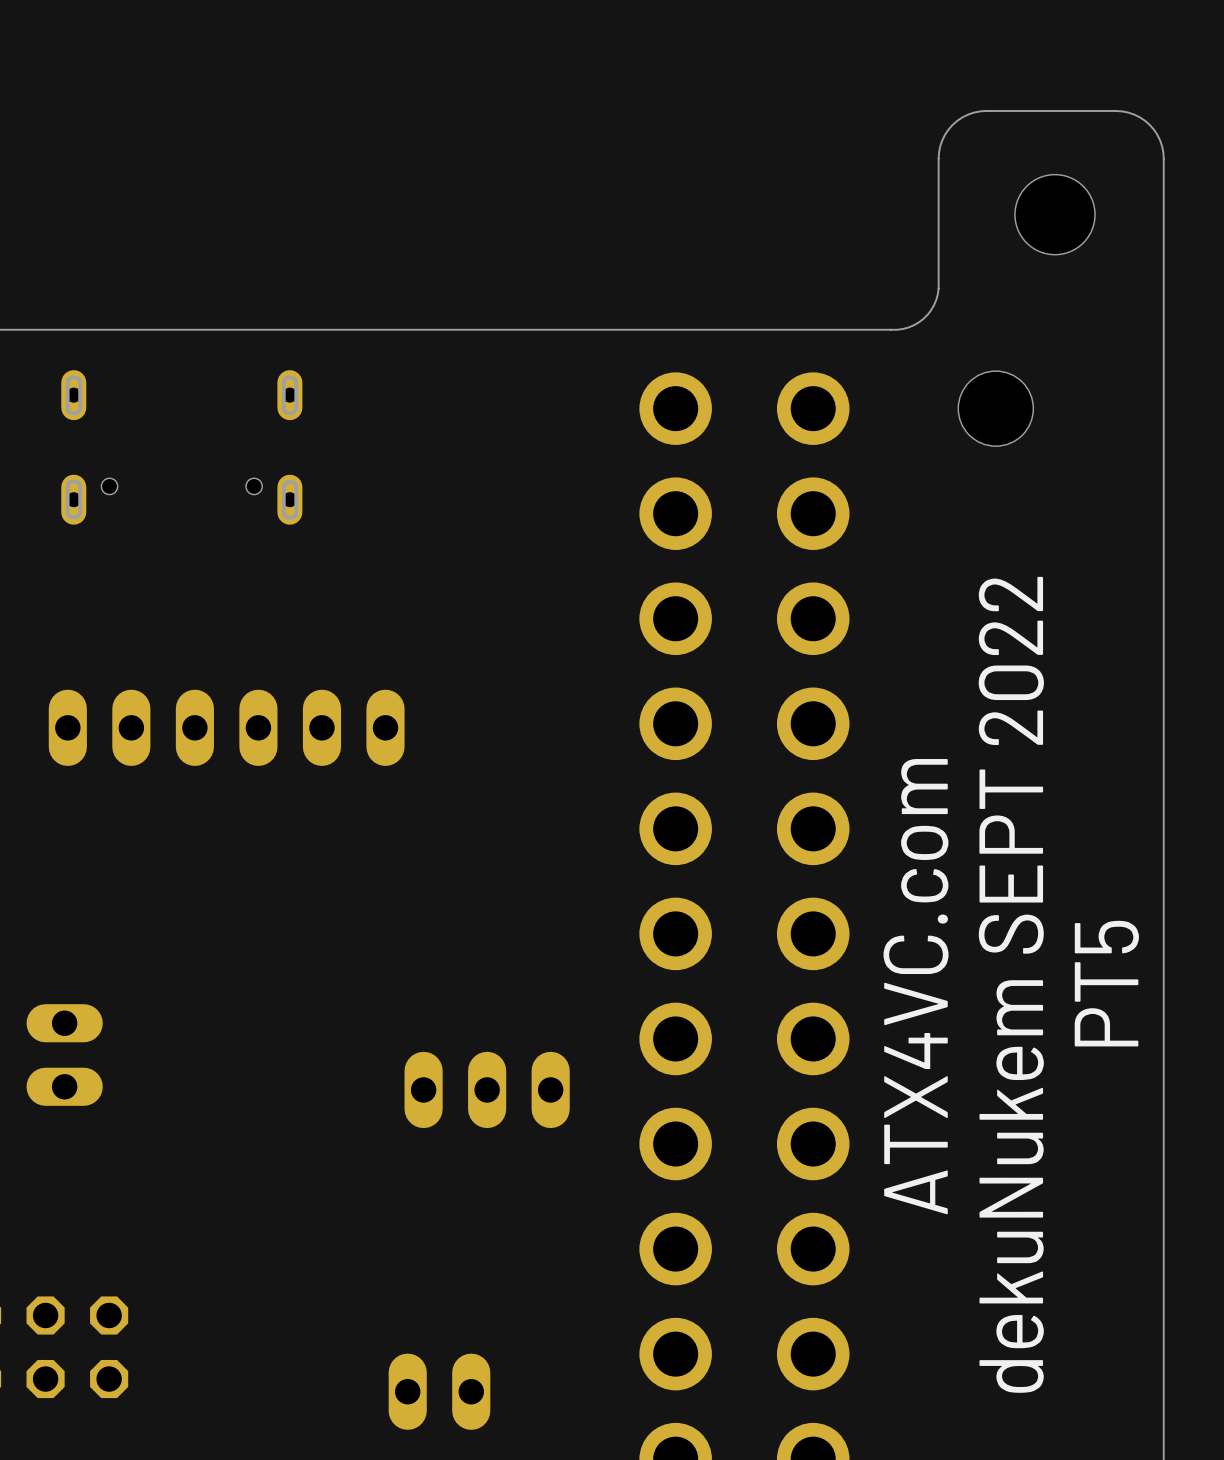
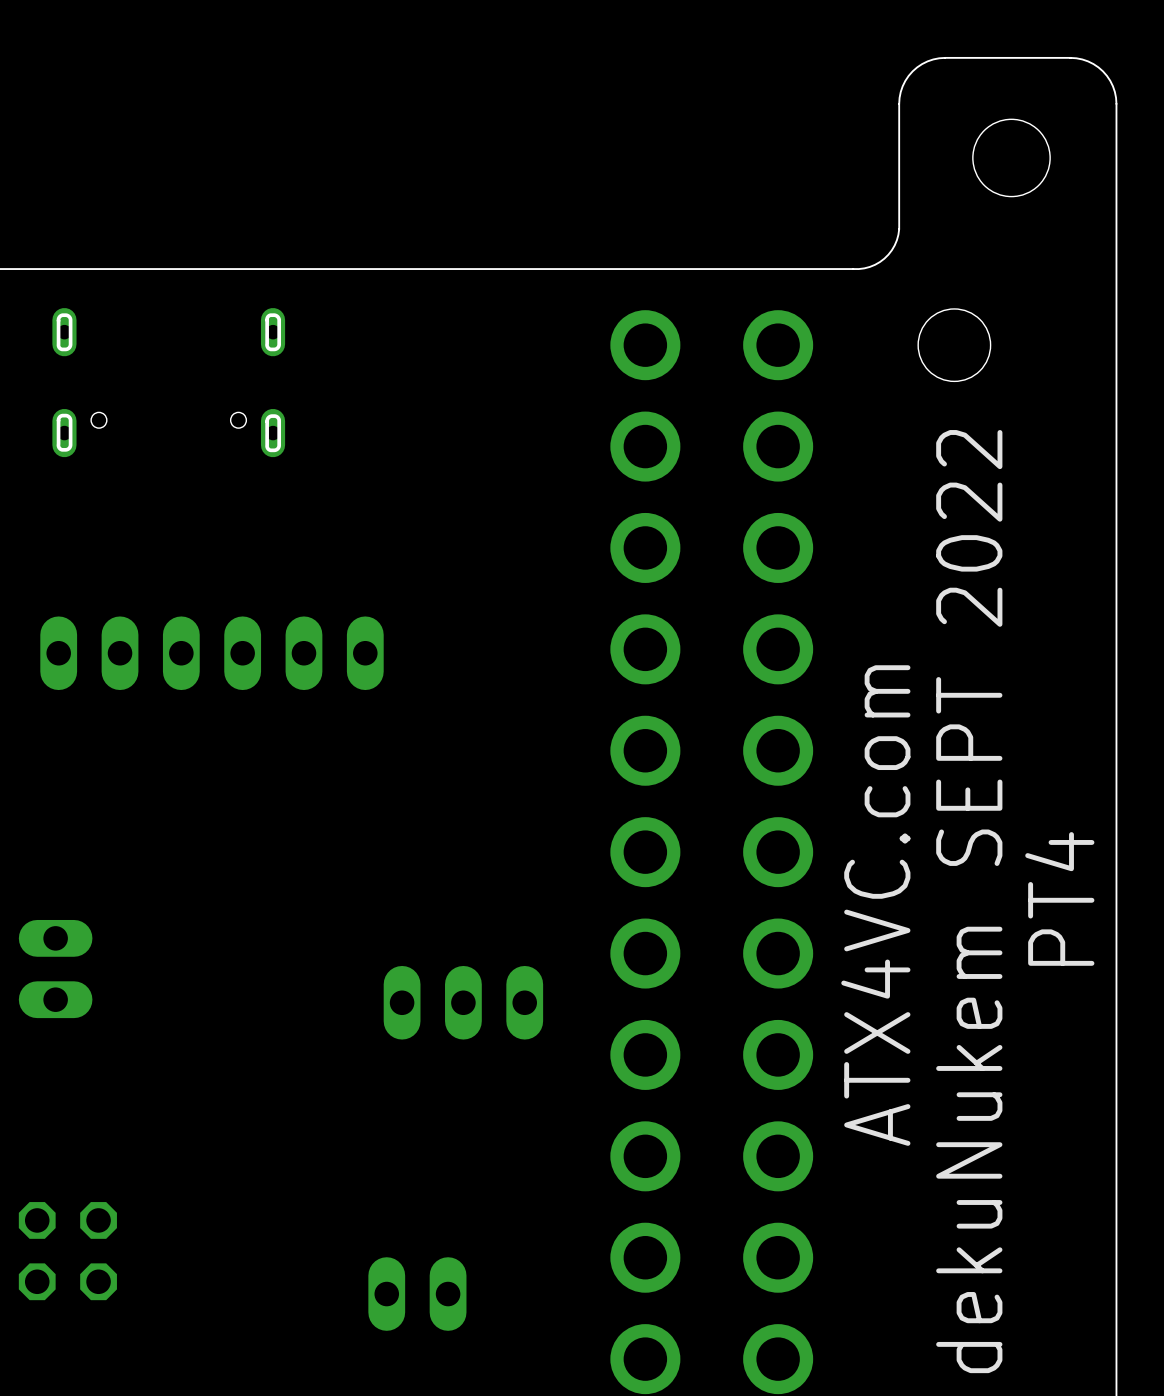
text: PT5 (1106, 983) -> PT4 (1059, 898)

